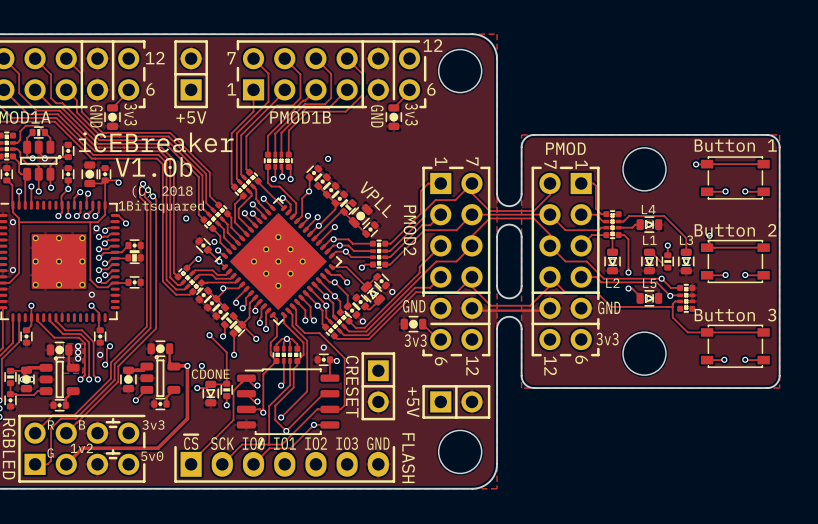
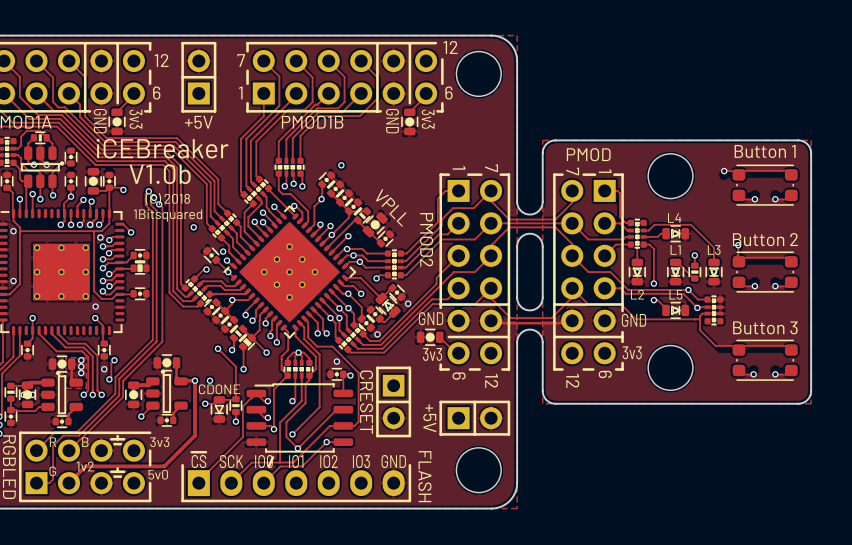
part footprint: [700, 156, 770, 200] -> [732, 164, 798, 206]
part footprint: [700, 239, 770, 284] -> [732, 251, 798, 293]
part footprint: [700, 324, 770, 368] -> [732, 339, 798, 381]

